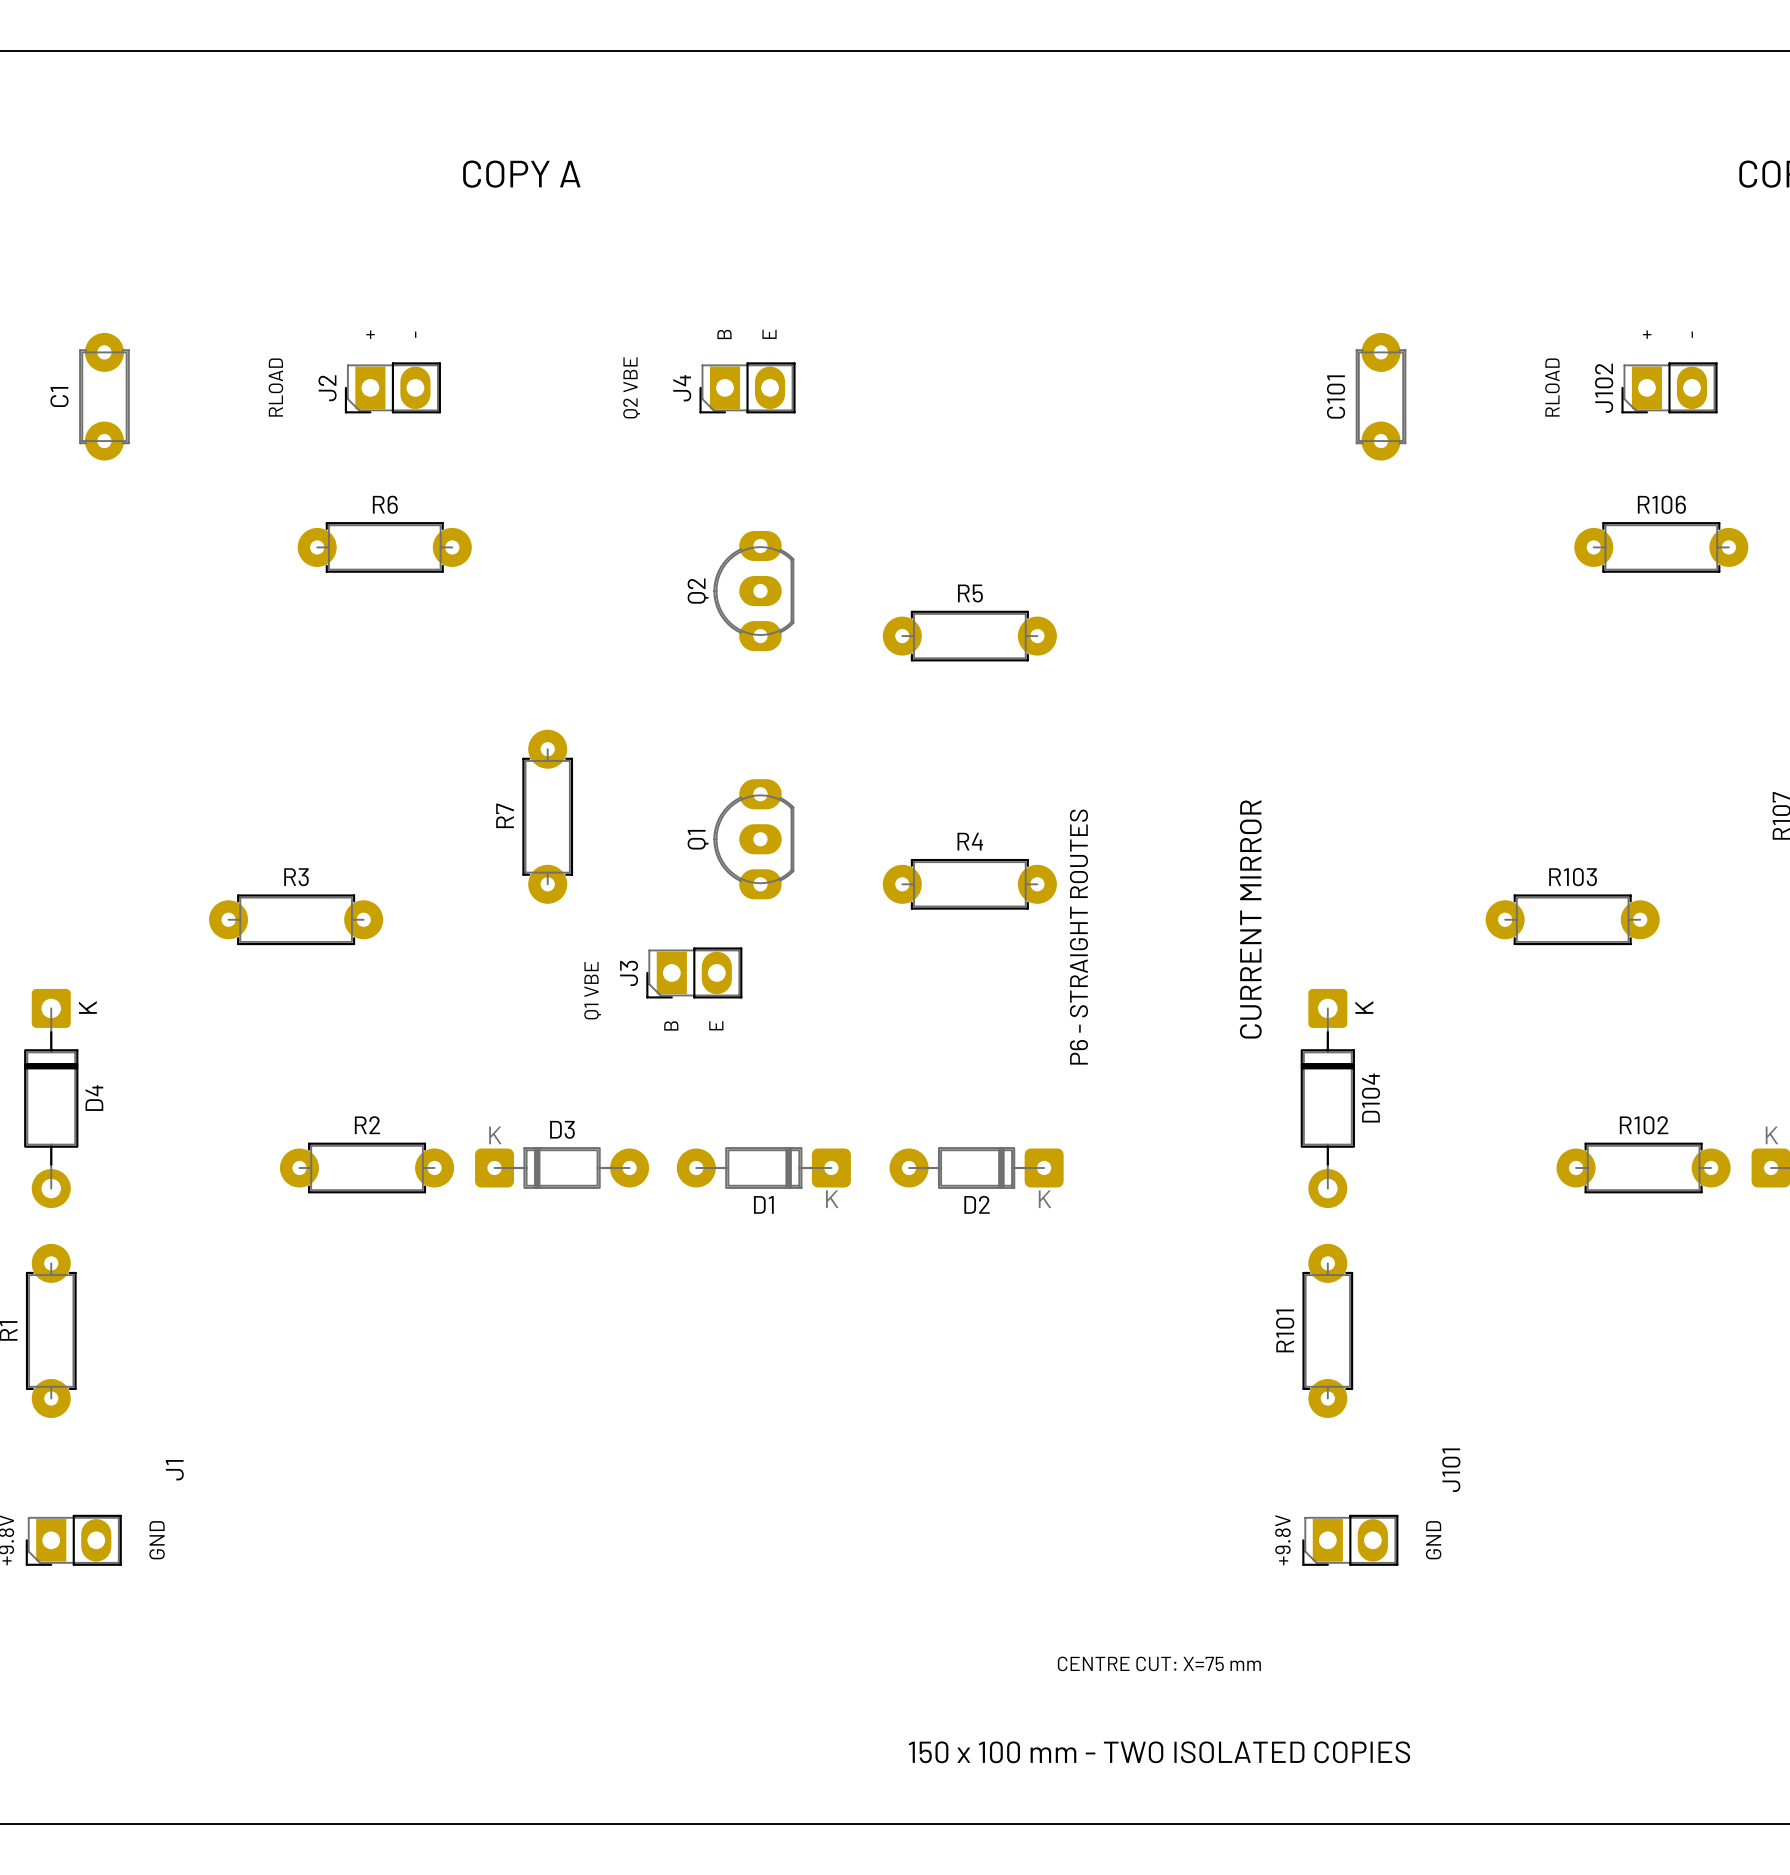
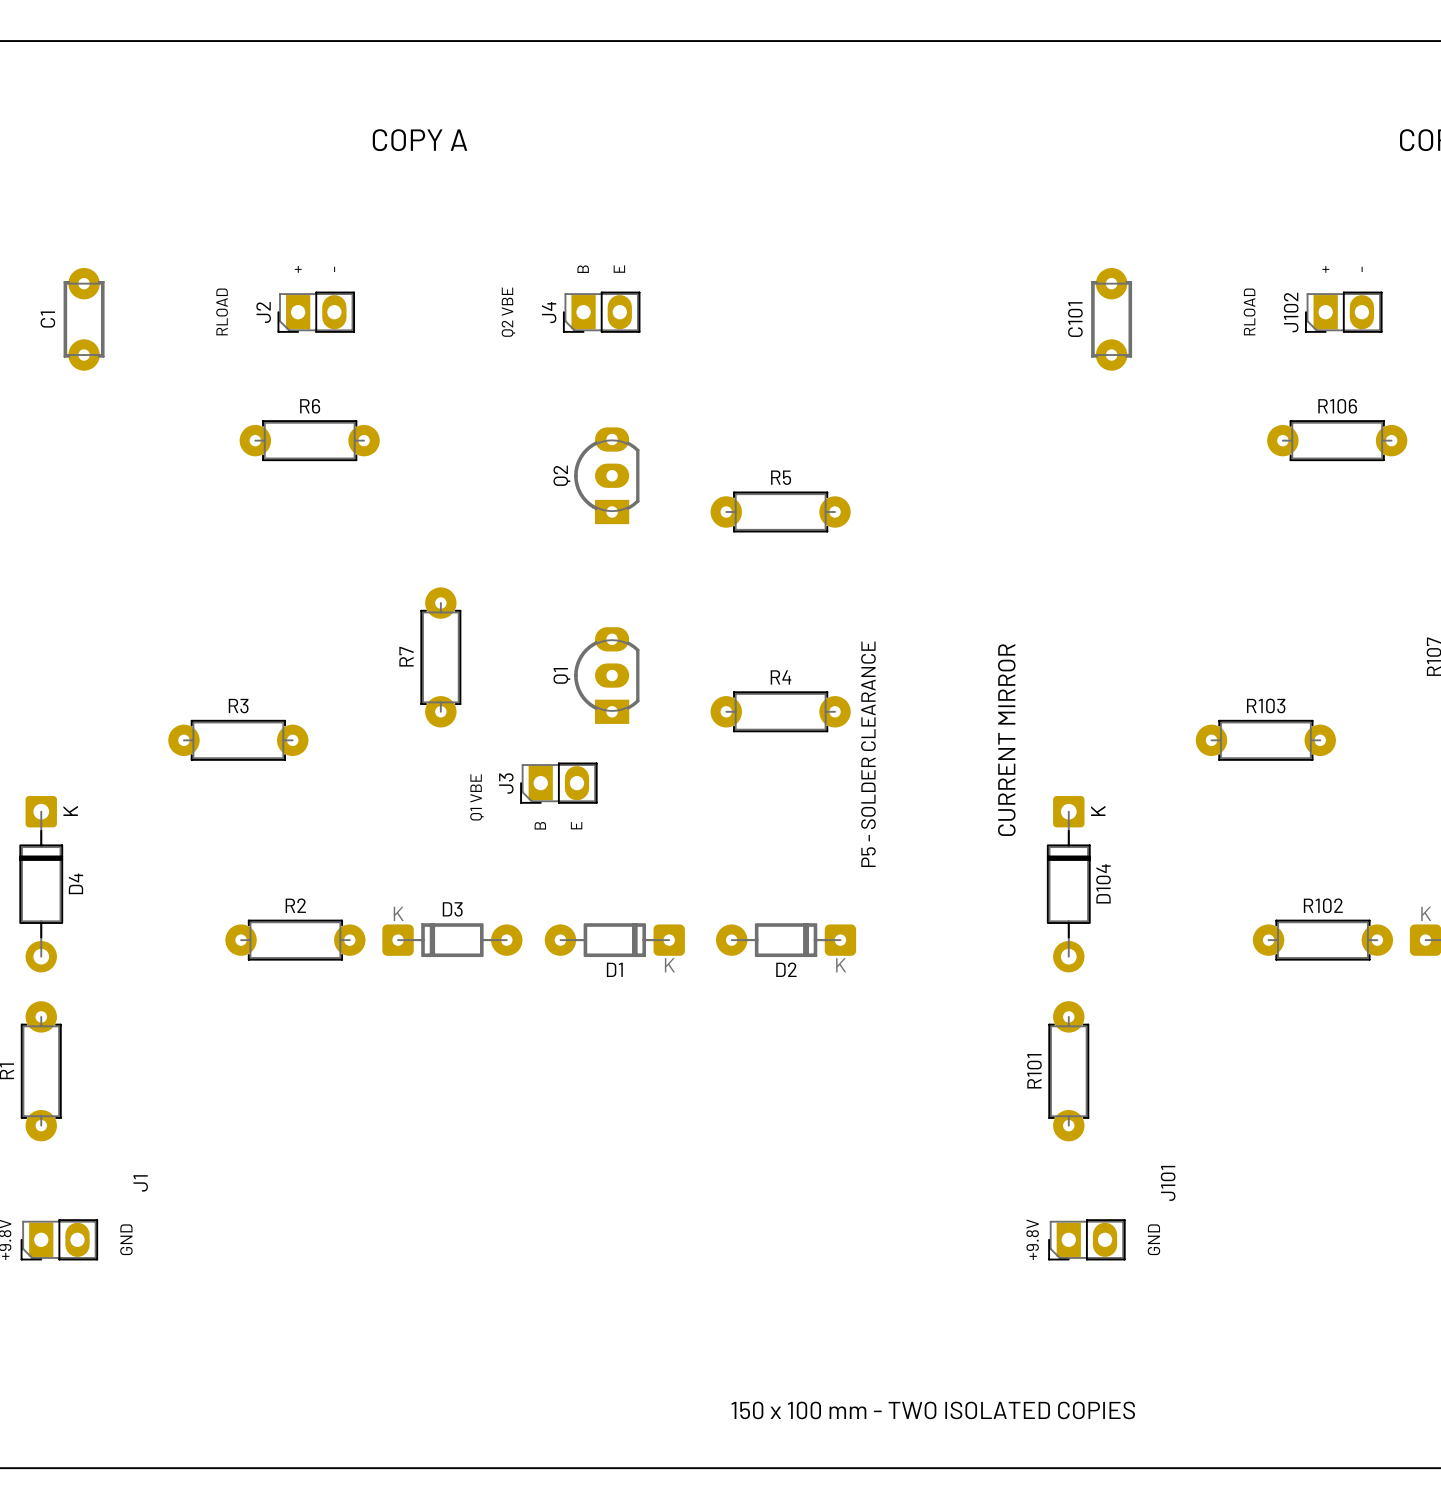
Q2 footprint: [713, 530, 795, 652] -> [574, 427, 640, 525]
Q1 footprint: [713, 779, 795, 900] -> [574, 627, 640, 724]
text: P6 - STRAIGHT ROUTES (1078, 937) -> P5 - SOLDER CLEARANCE (868, 754)
text: CENTRE CUT: X=75 mm (1159, 1663) -> none

